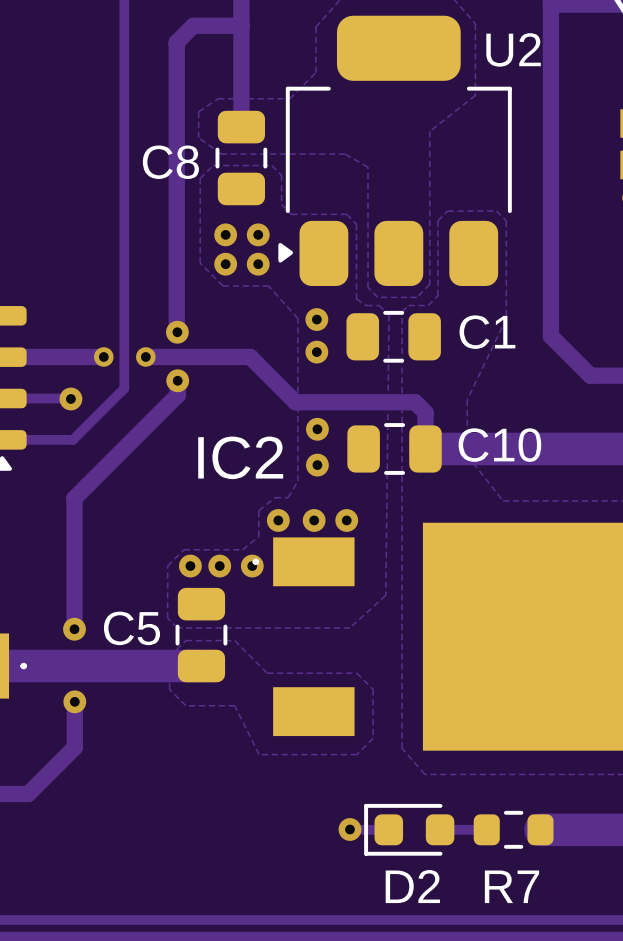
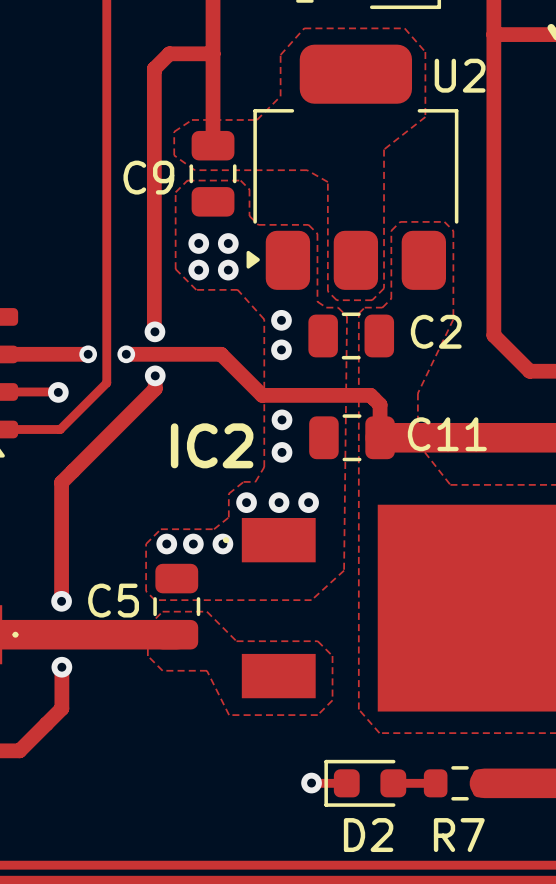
C8 name: C8 (170, 162) -> C9 (148, 177)
C1 name: C1 (487, 332) -> C2 (436, 331)
C10 name: C10 (499, 445) -> C11 (447, 434)

